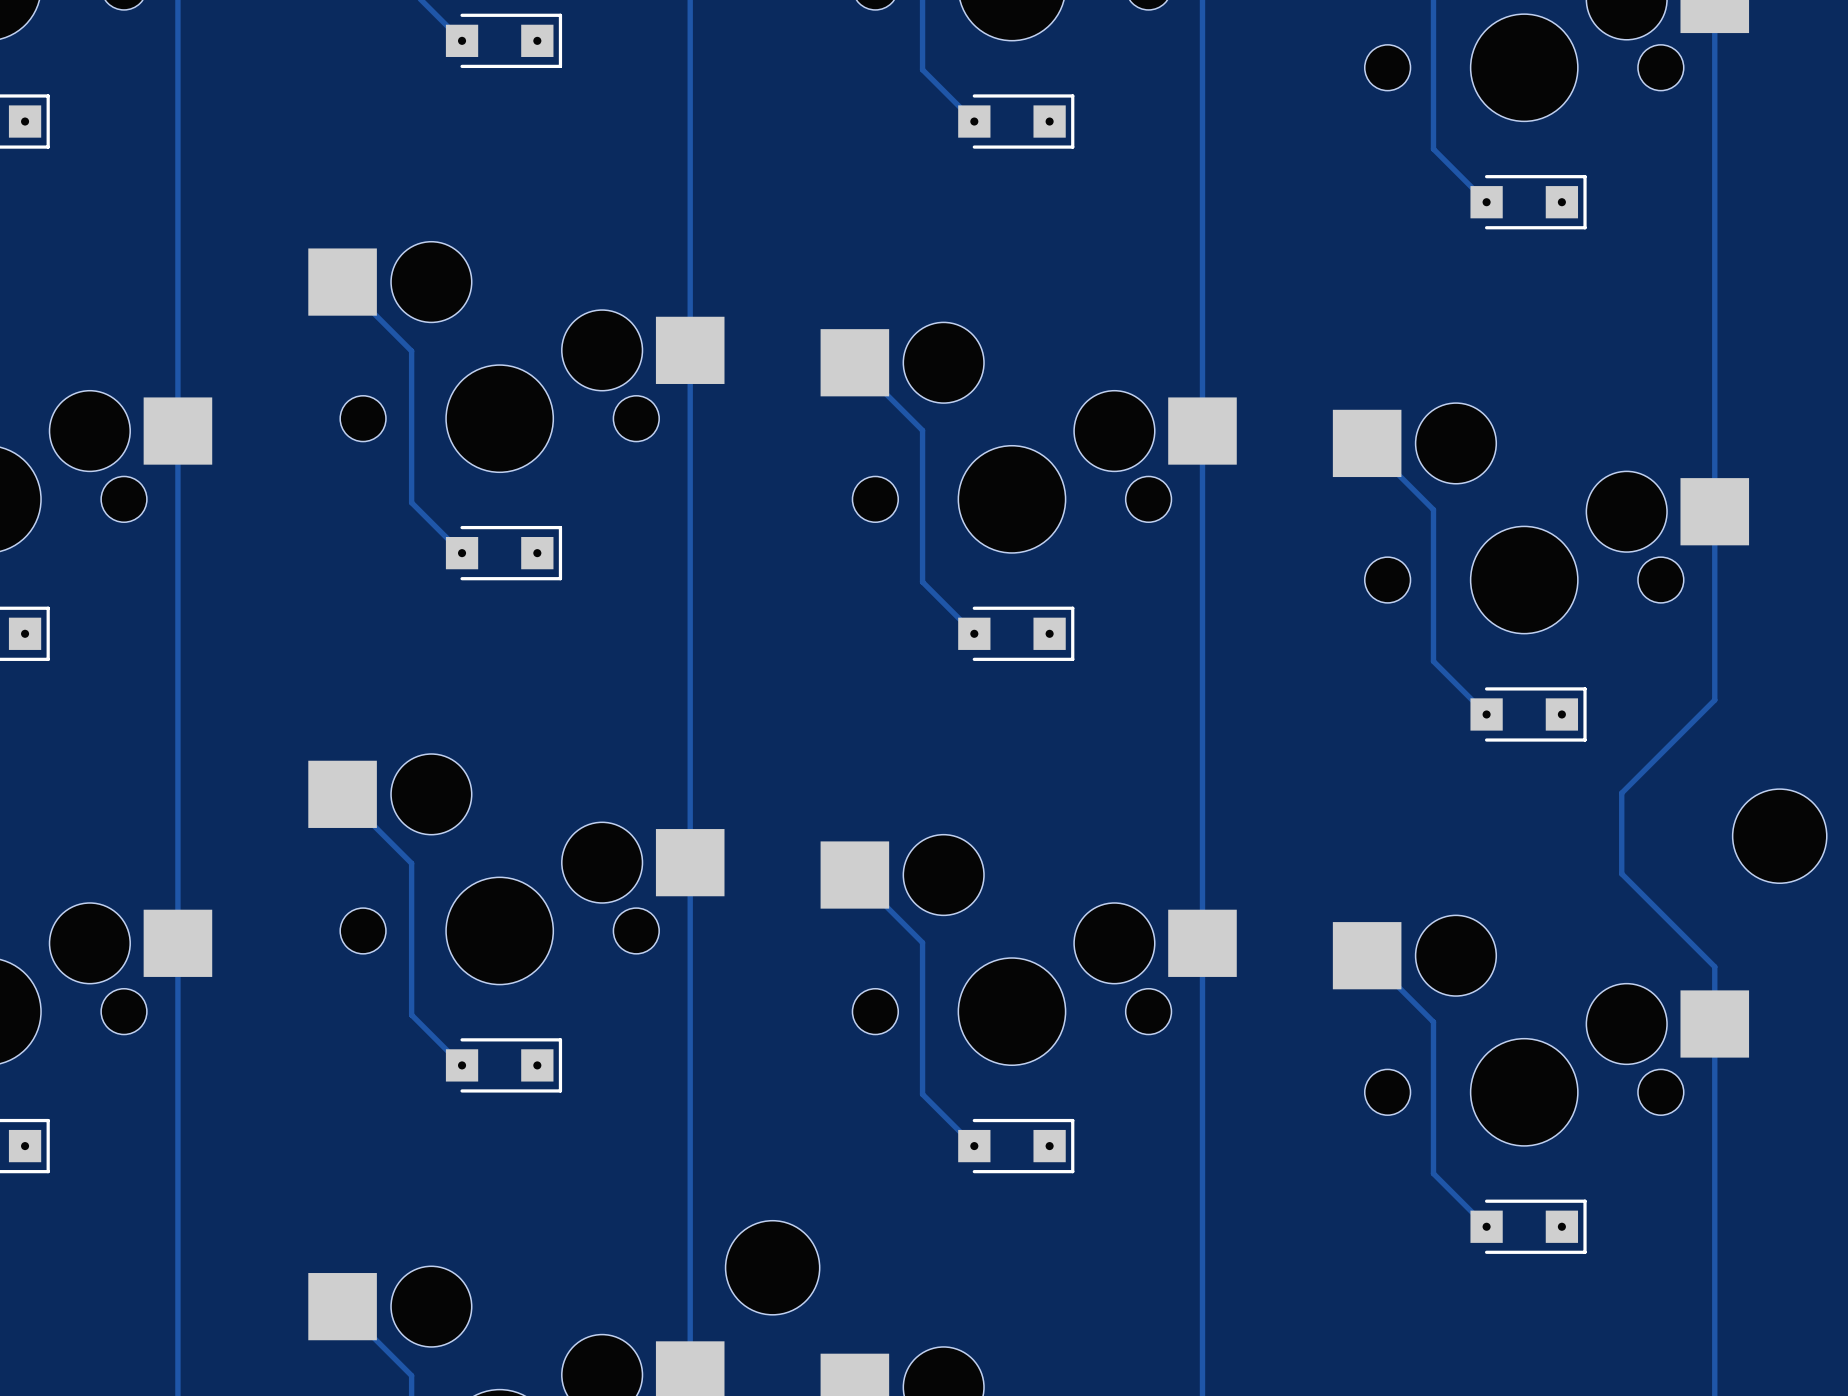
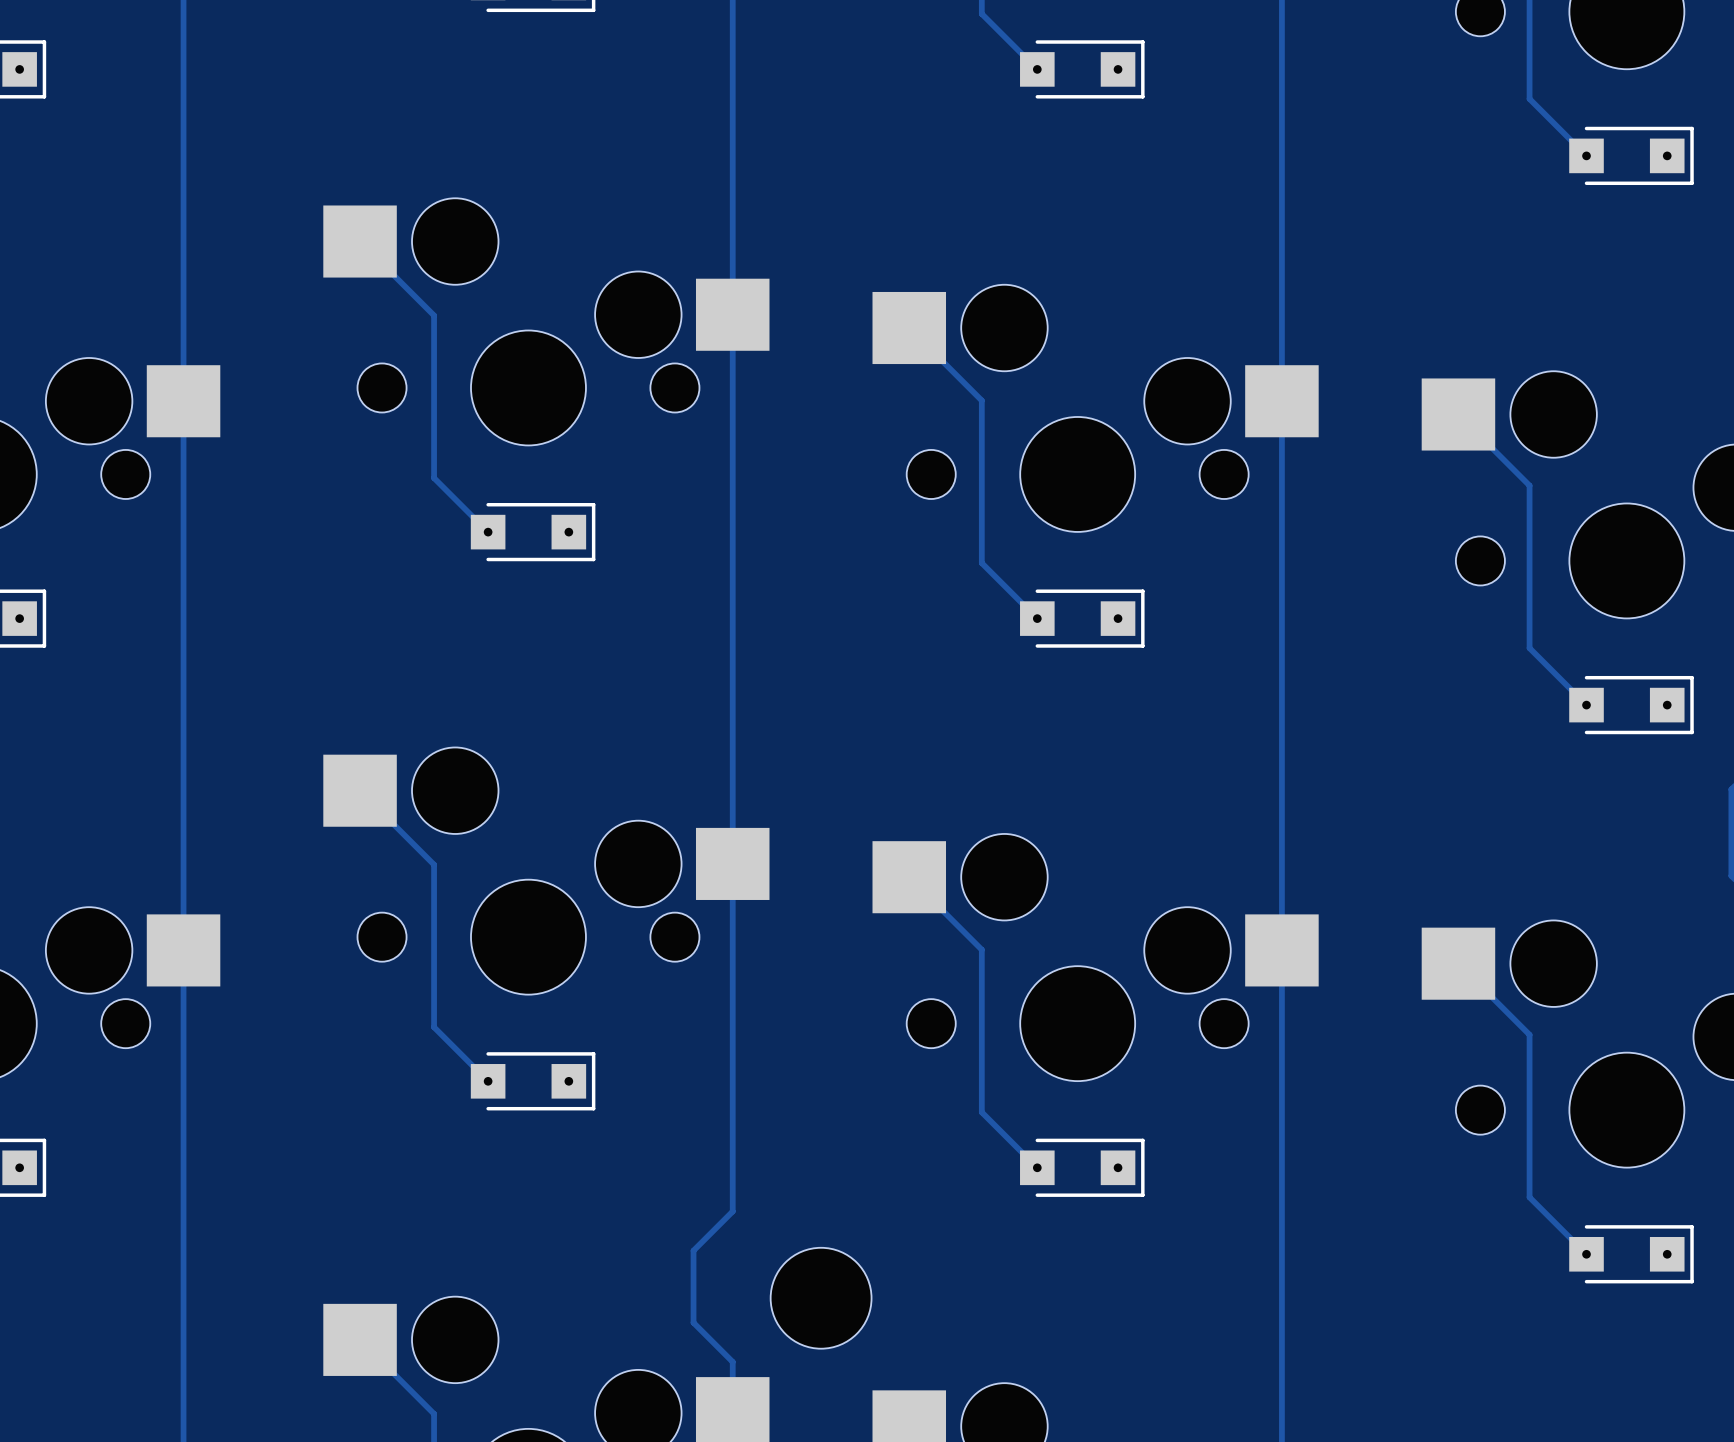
track: (690, 1186) (690, 1327) -> (732, 1211) (693, 1250) (693, 1322) (732, 1361)

